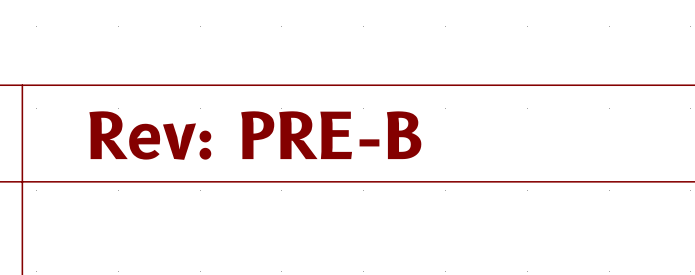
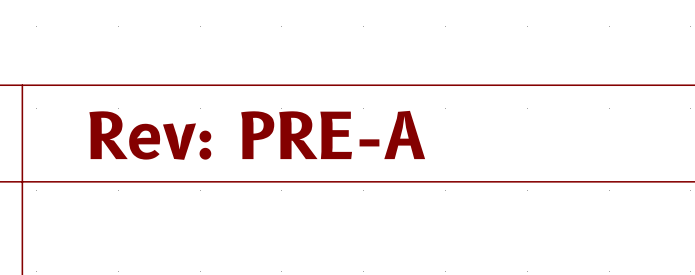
title block: Rev: PRE-B (255, 135) -> Rev: PRE-A (257, 135)

